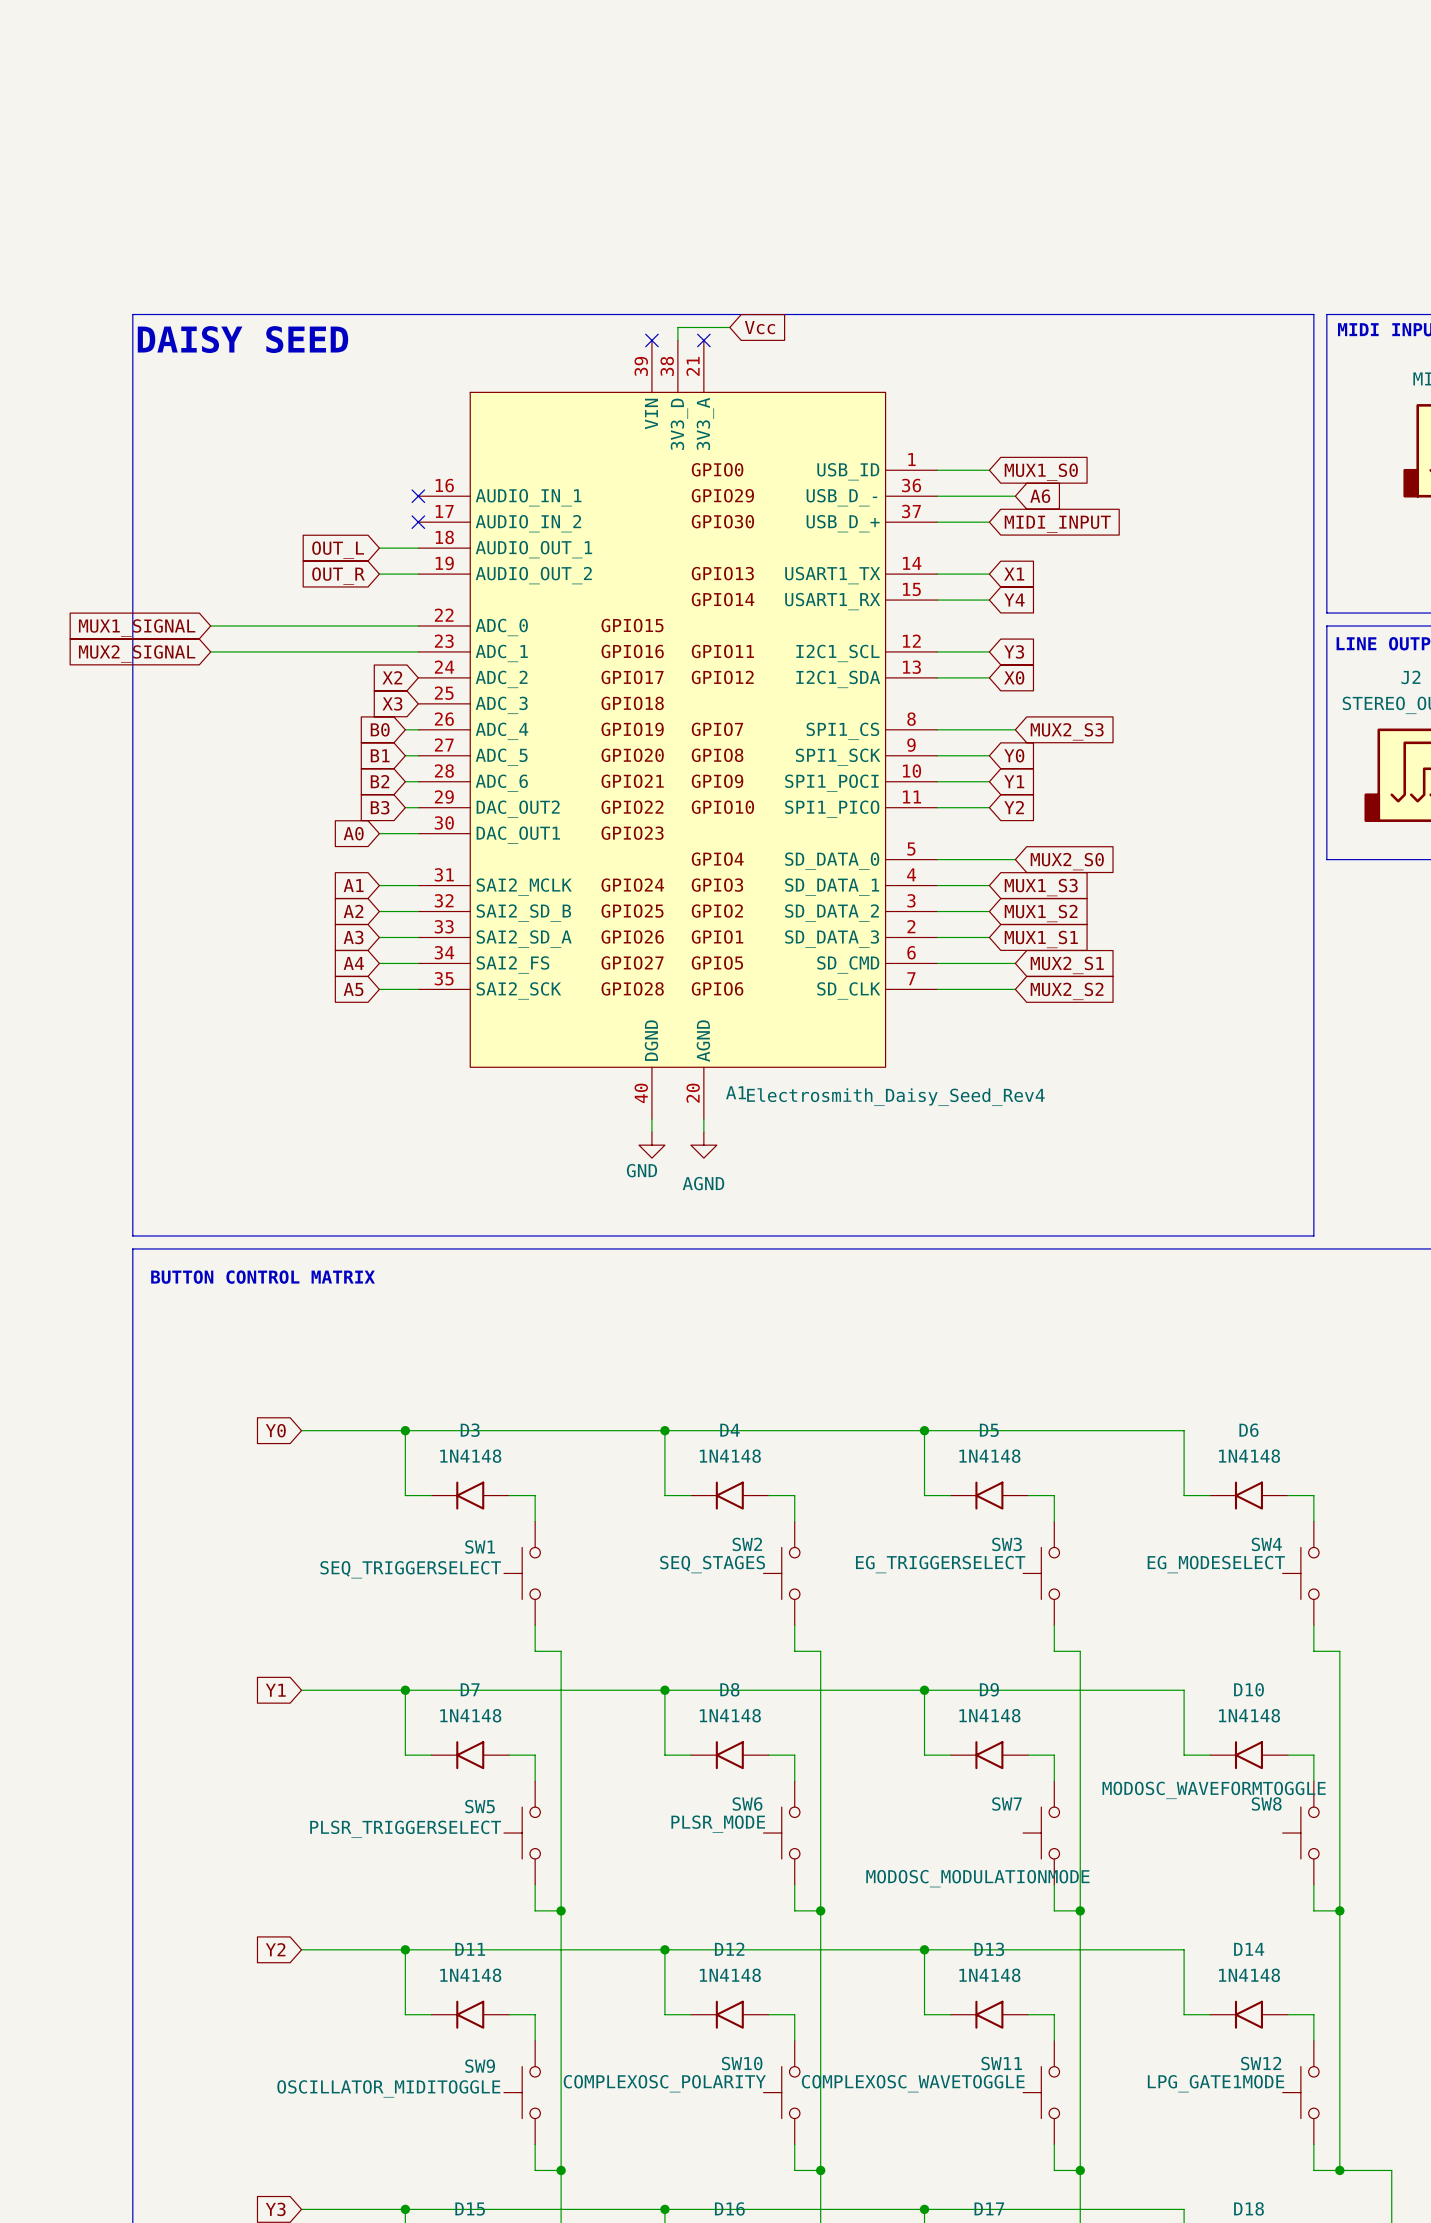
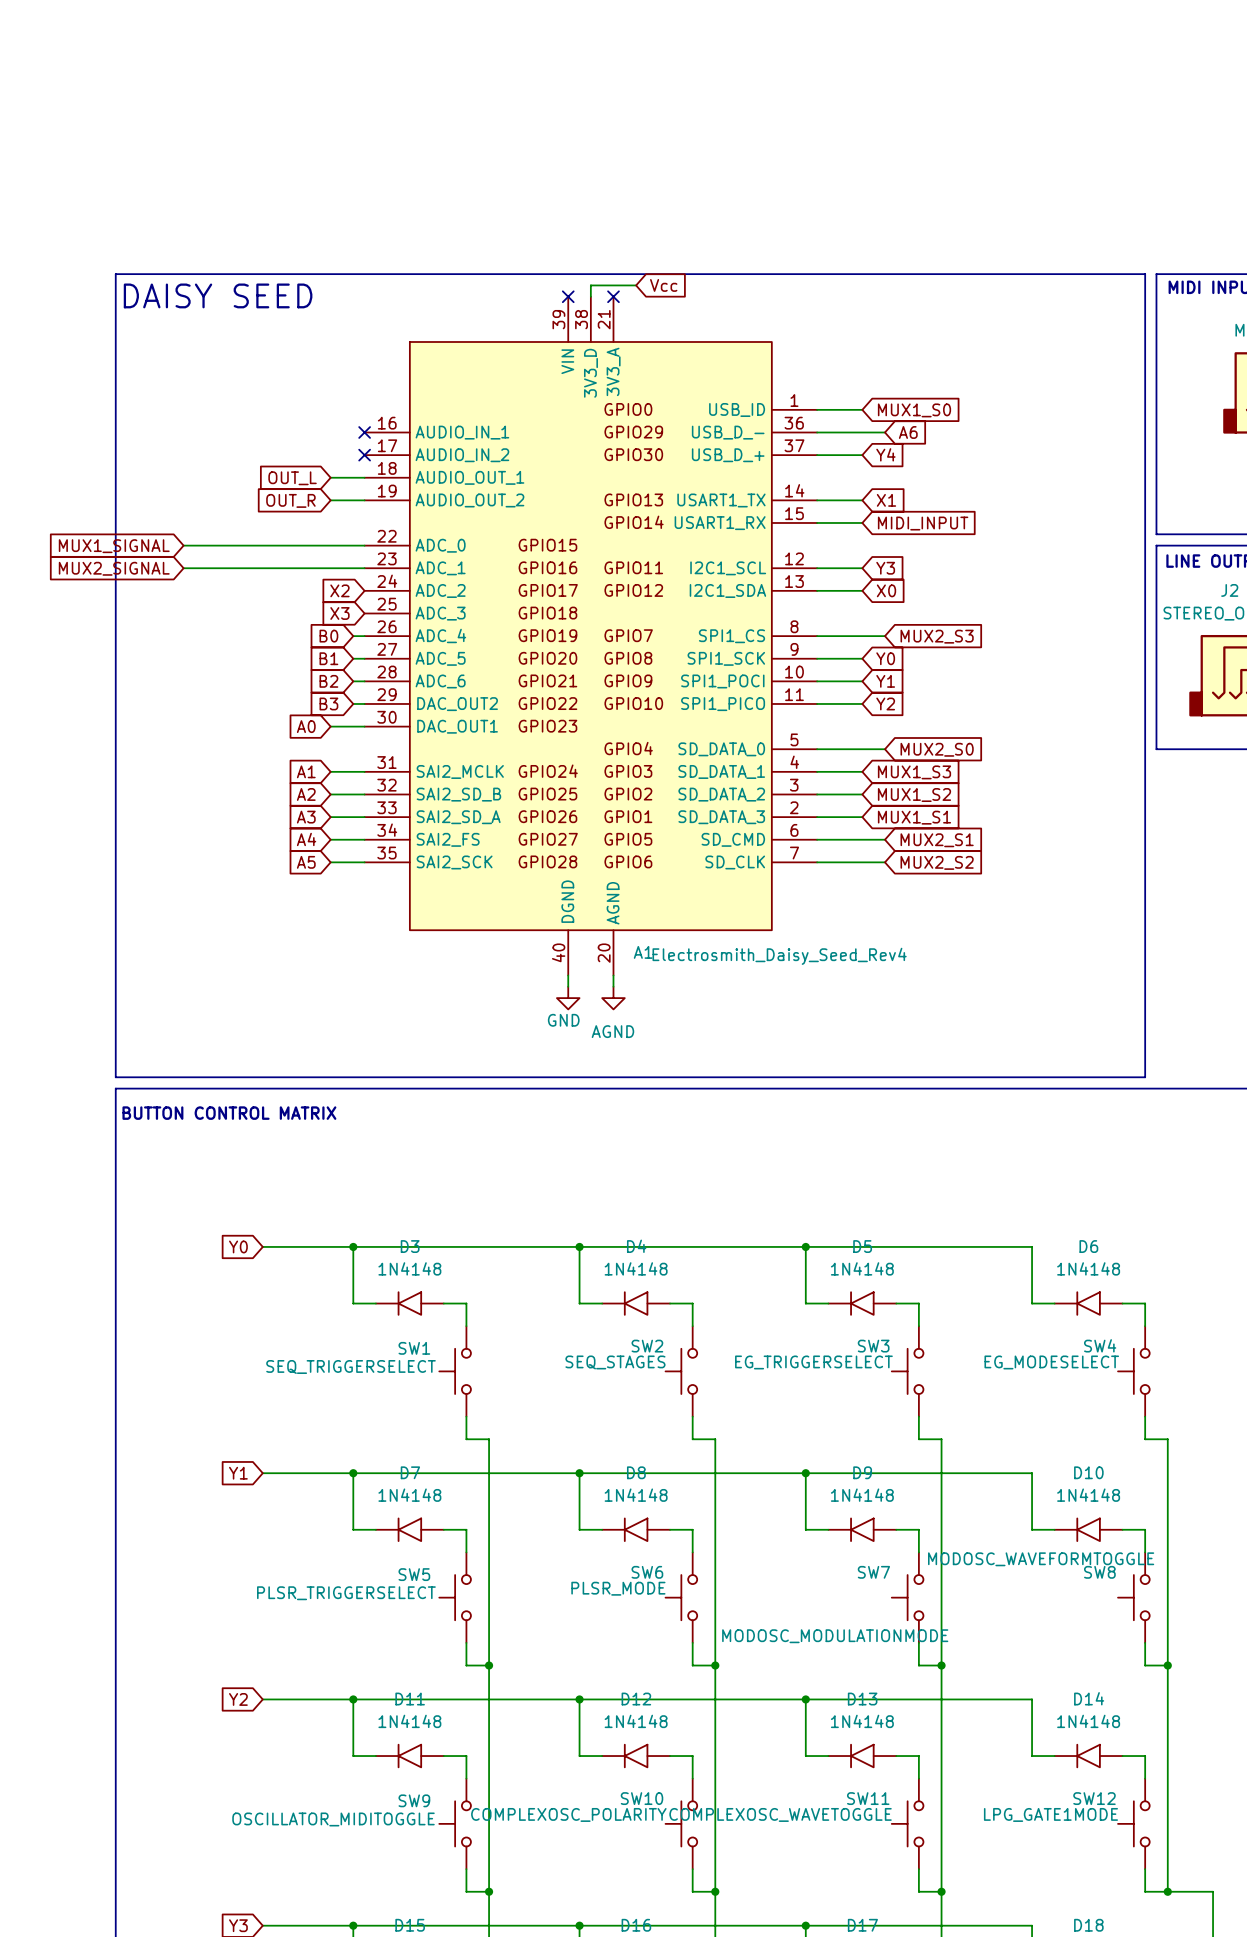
global label: MIDI_INPUT (1057, 524) -> Y4 (885, 454)
global label: Y4 (1014, 600) -> MIDI_INPUT (923, 523)

